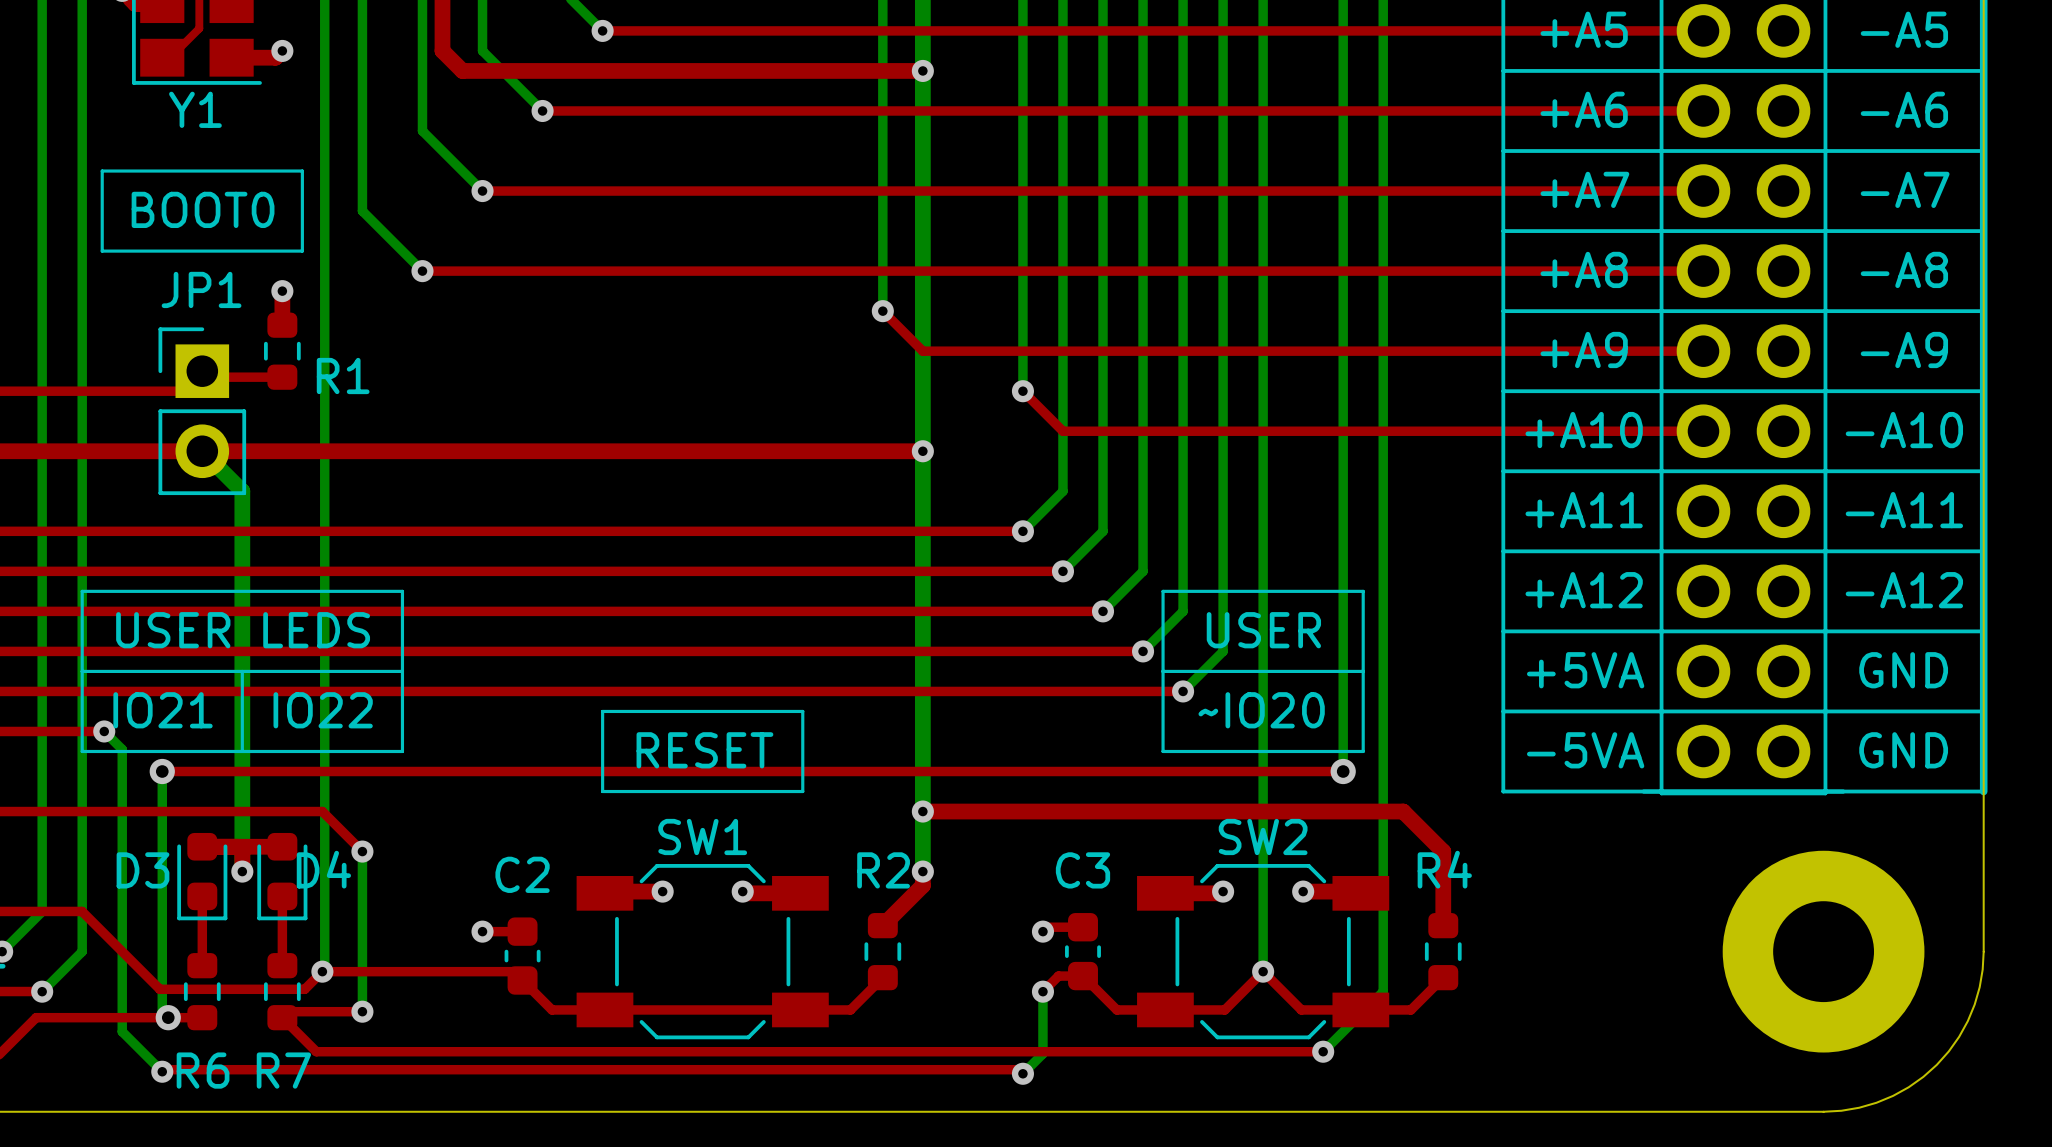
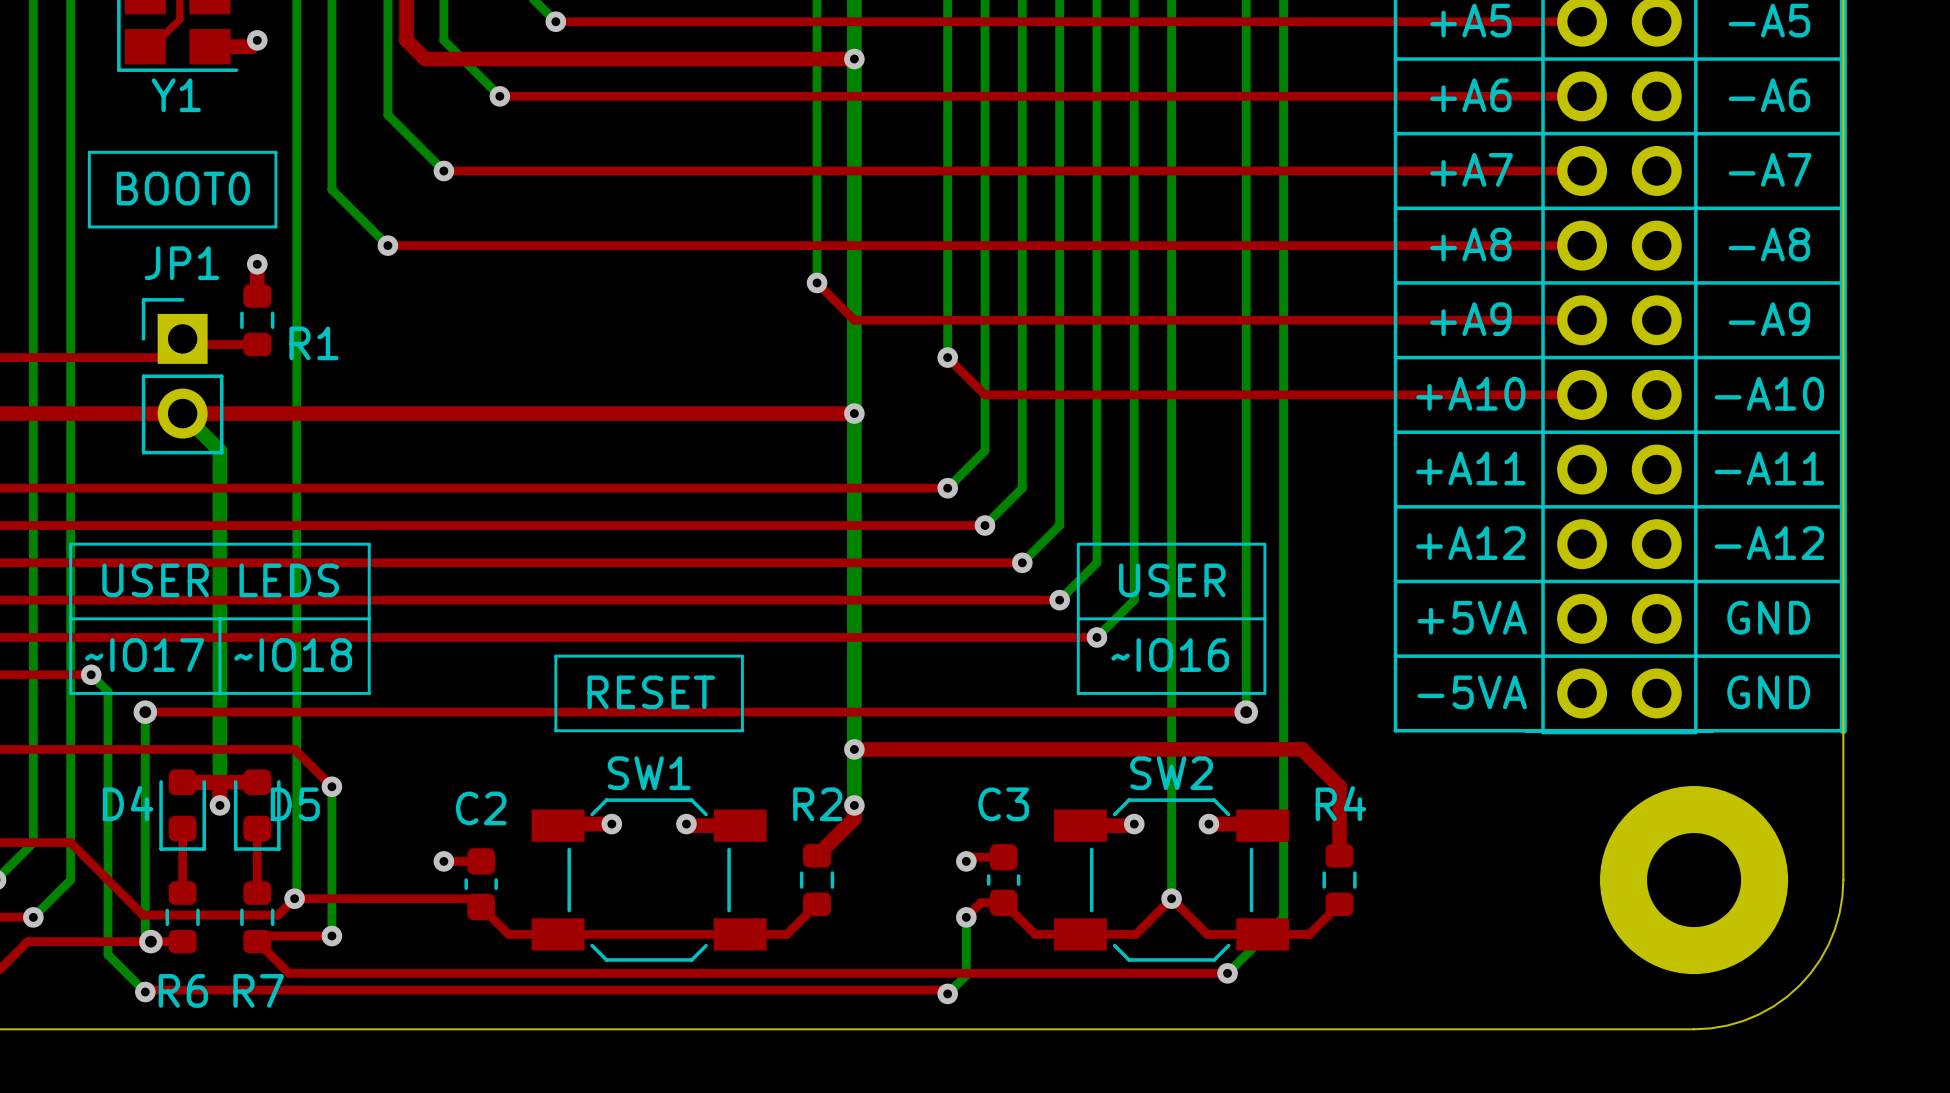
text: IO21 (163, 710) -> ~IO17 (144, 655)
text: IO22 (323, 710) -> ~IO18 (293, 655)
text: ~IO20 (1261, 710) -> ~IO16 (1170, 655)
D4 name: D4 (323, 869) -> D5 (295, 804)
D3 name: D3 (143, 870) -> D4 (128, 803)

